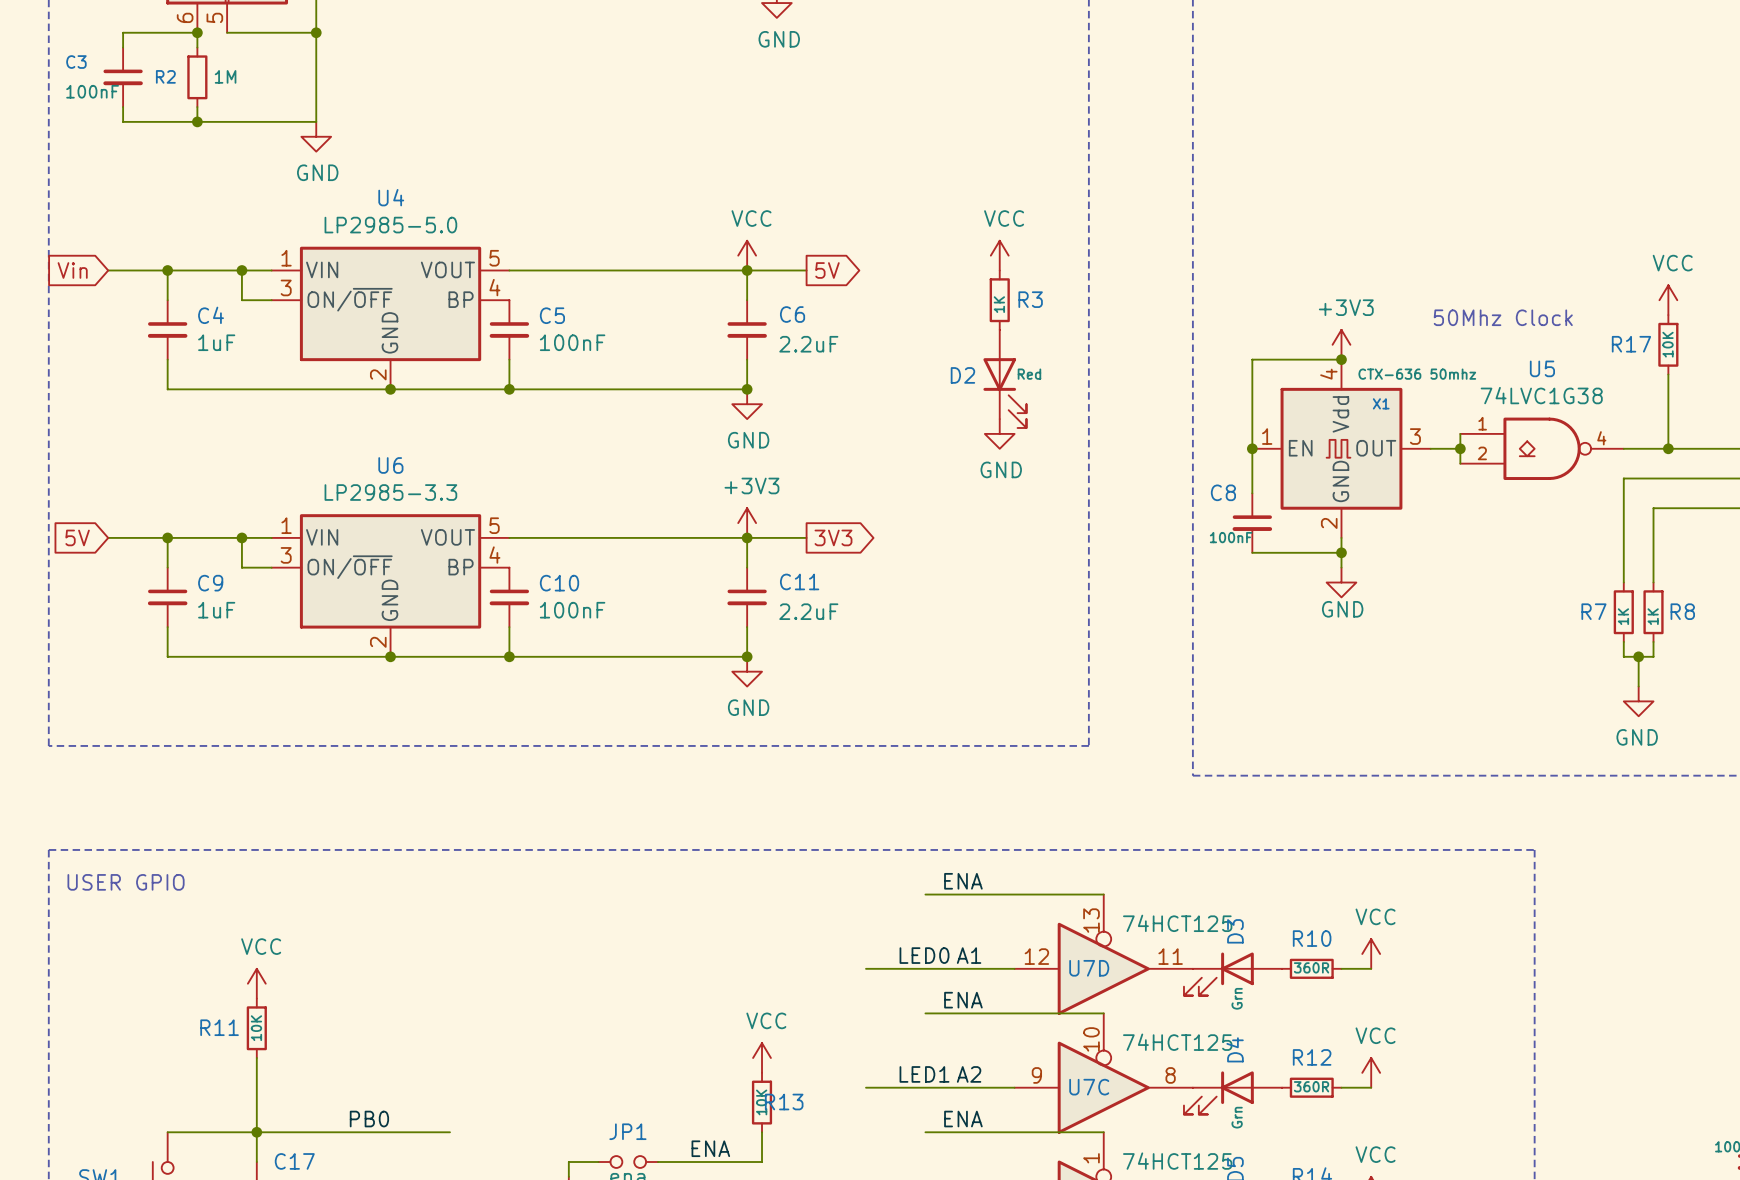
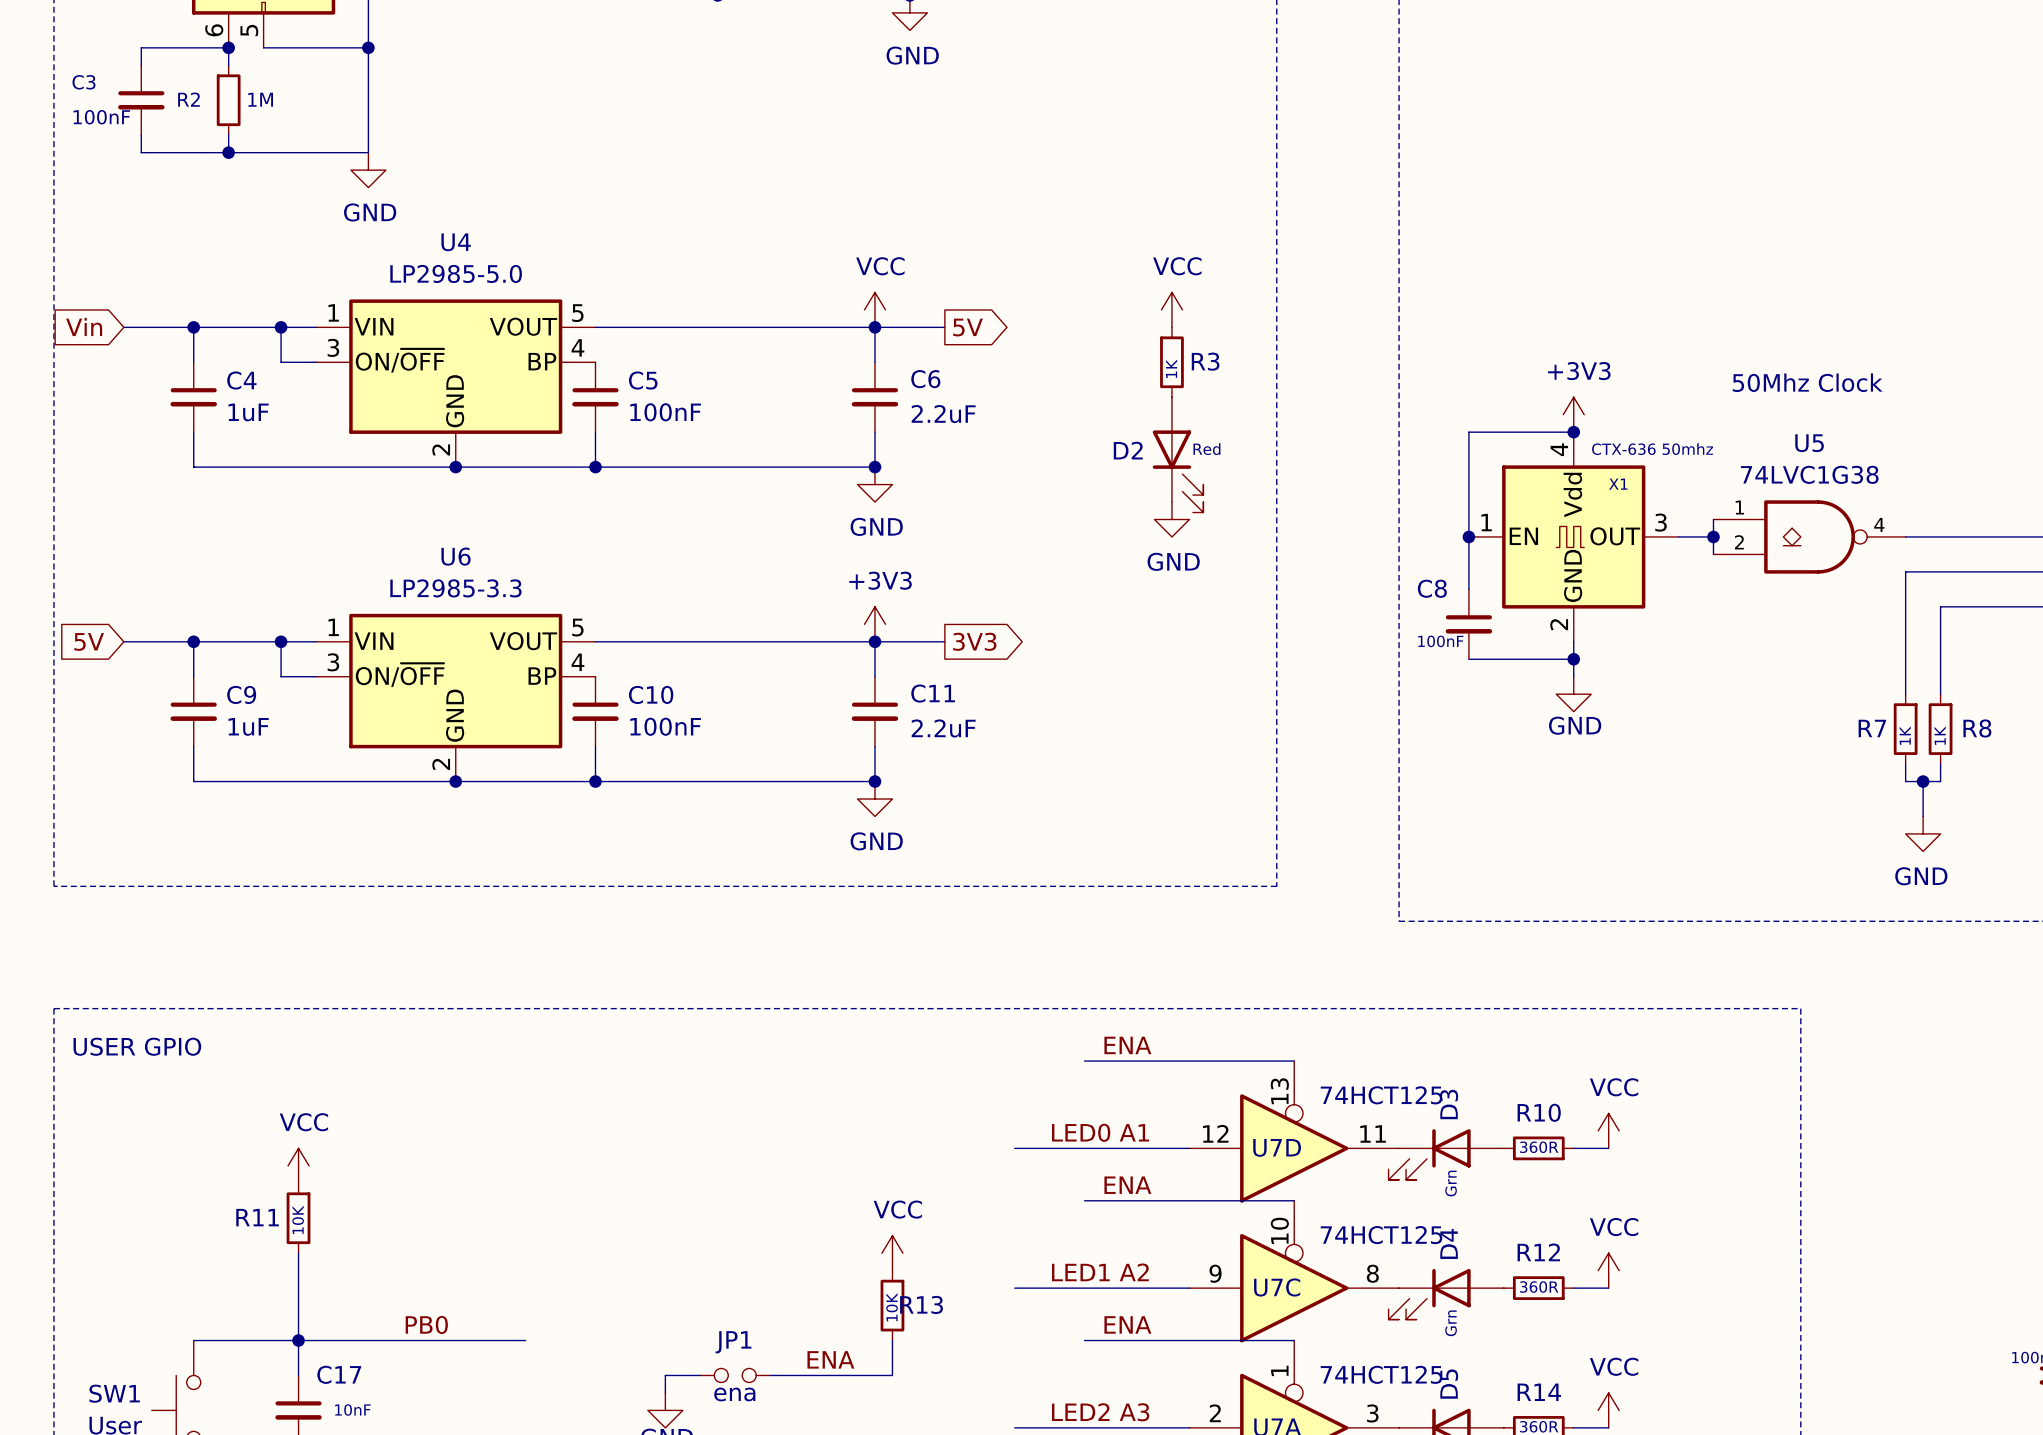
power symbol: VCC (1668, 300) -> none
text position: 50Mhz Clock (1503, 317) -> 50Mhz Clock (1807, 382)
R17: 10K (1668, 344) -> none
wire: (1668, 374) (1668, 448) -> none
junction: (1668, 448) -> none

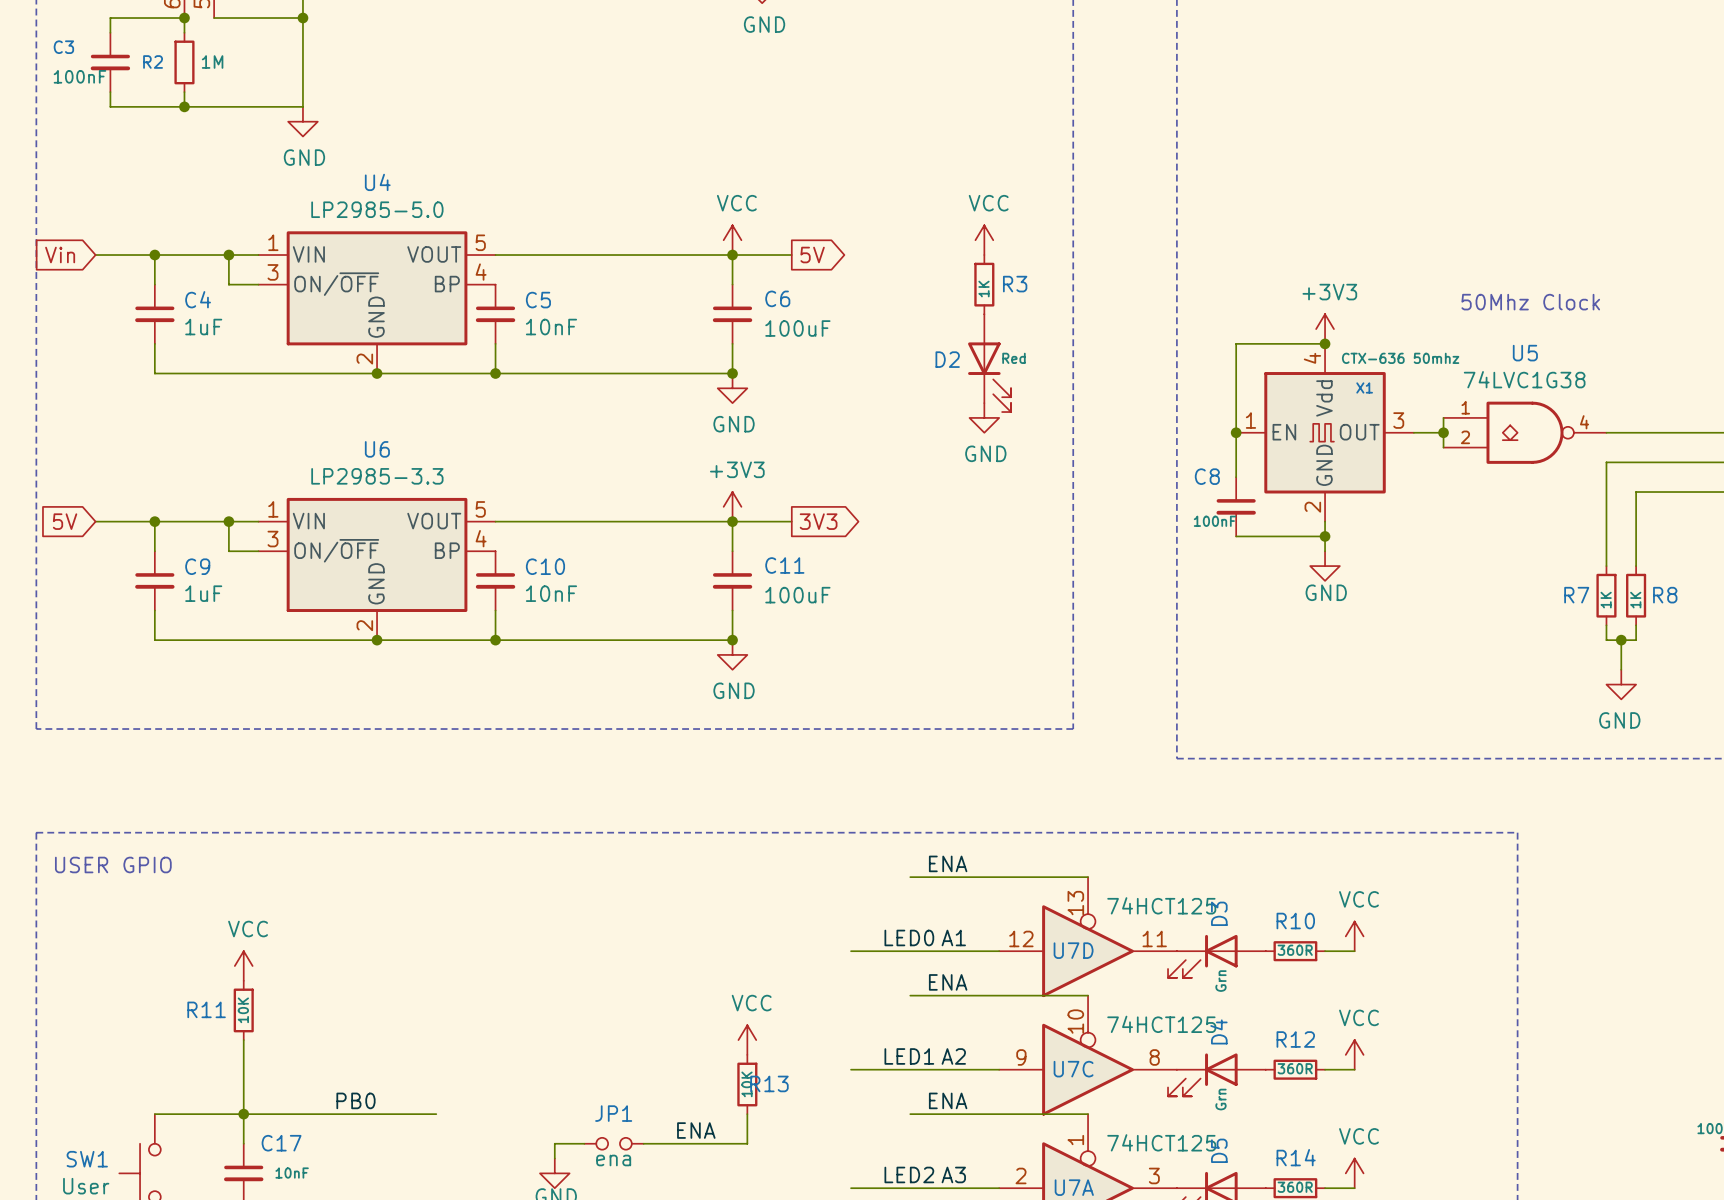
C5 value: 100nF (665, 412) -> 10nF (551, 327)
C6 value: 2.2uF (943, 414) -> 100uF (797, 328)
C10 value: 100nF (665, 726) -> 10nF (551, 593)
C11 value: 2.2uF (943, 728) -> 100uF (797, 595)

